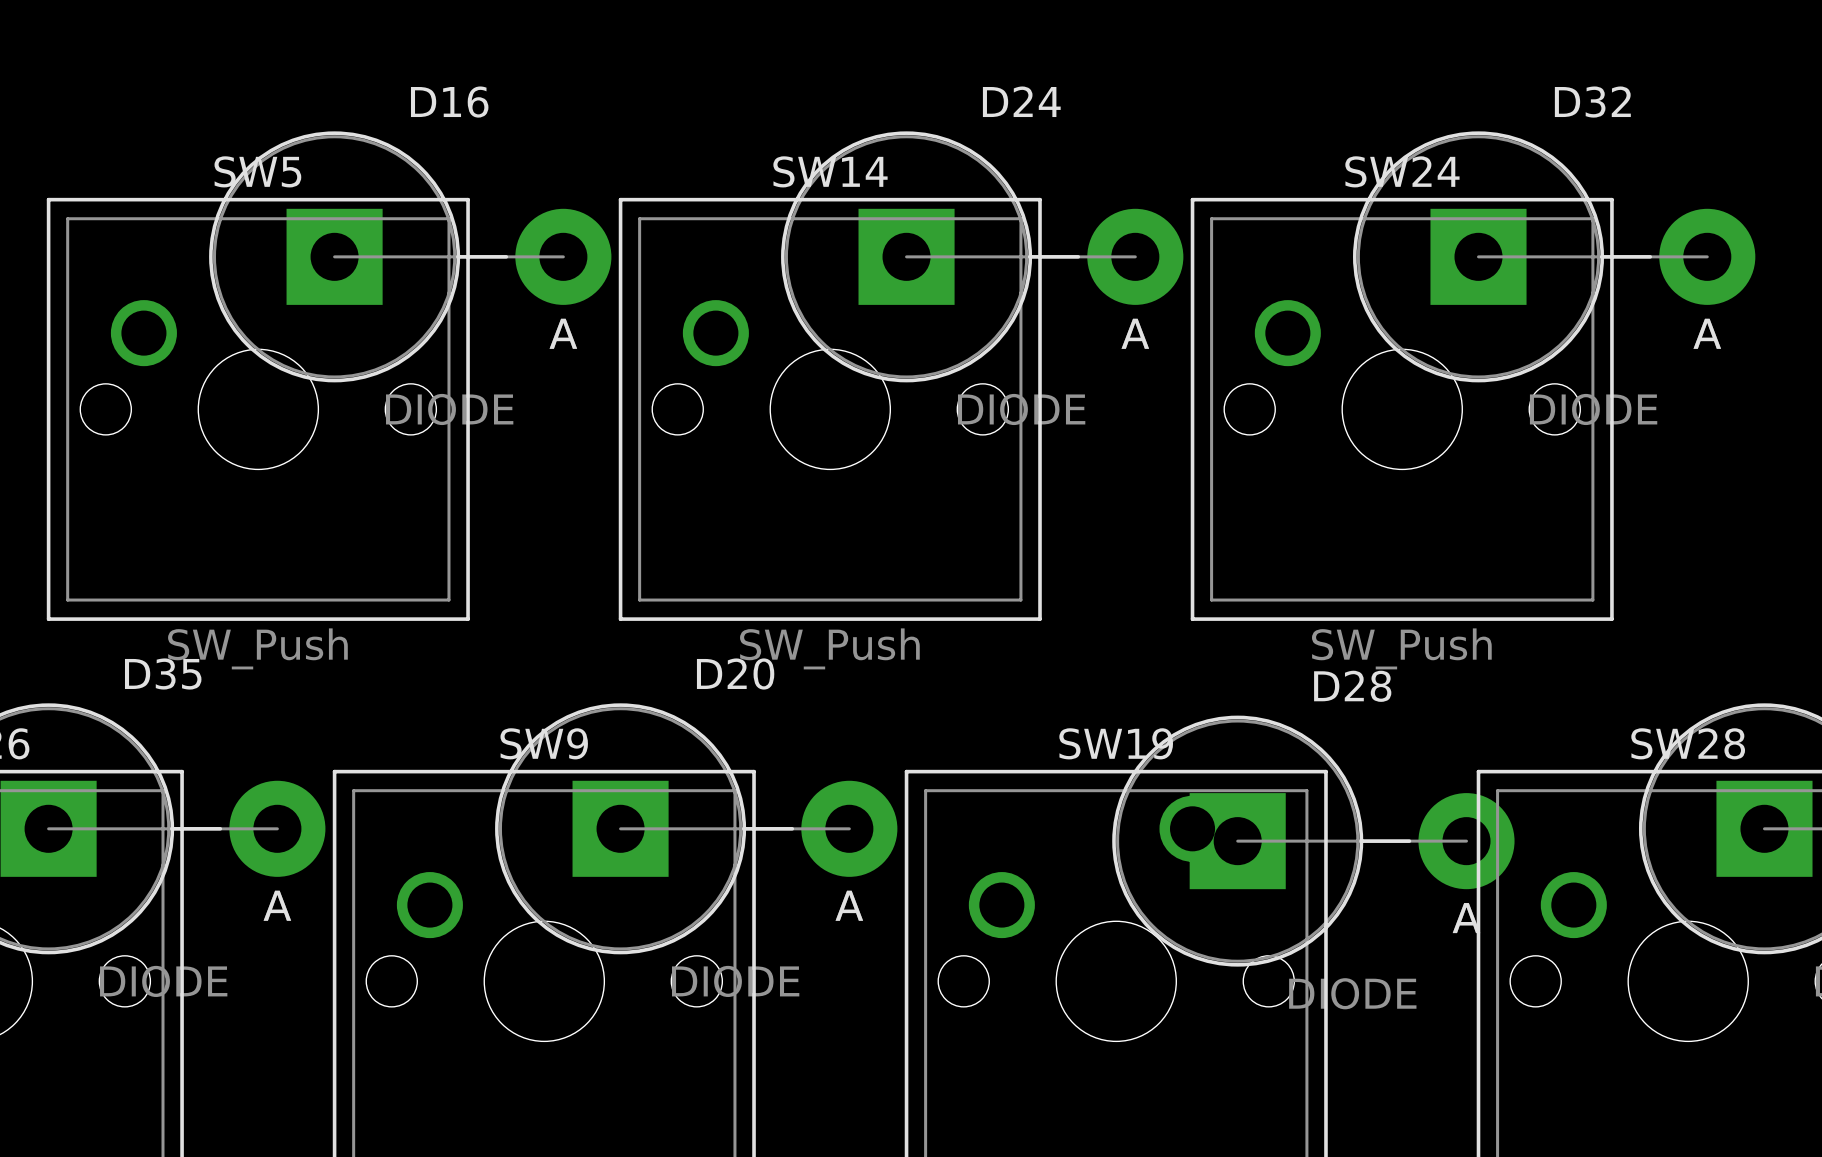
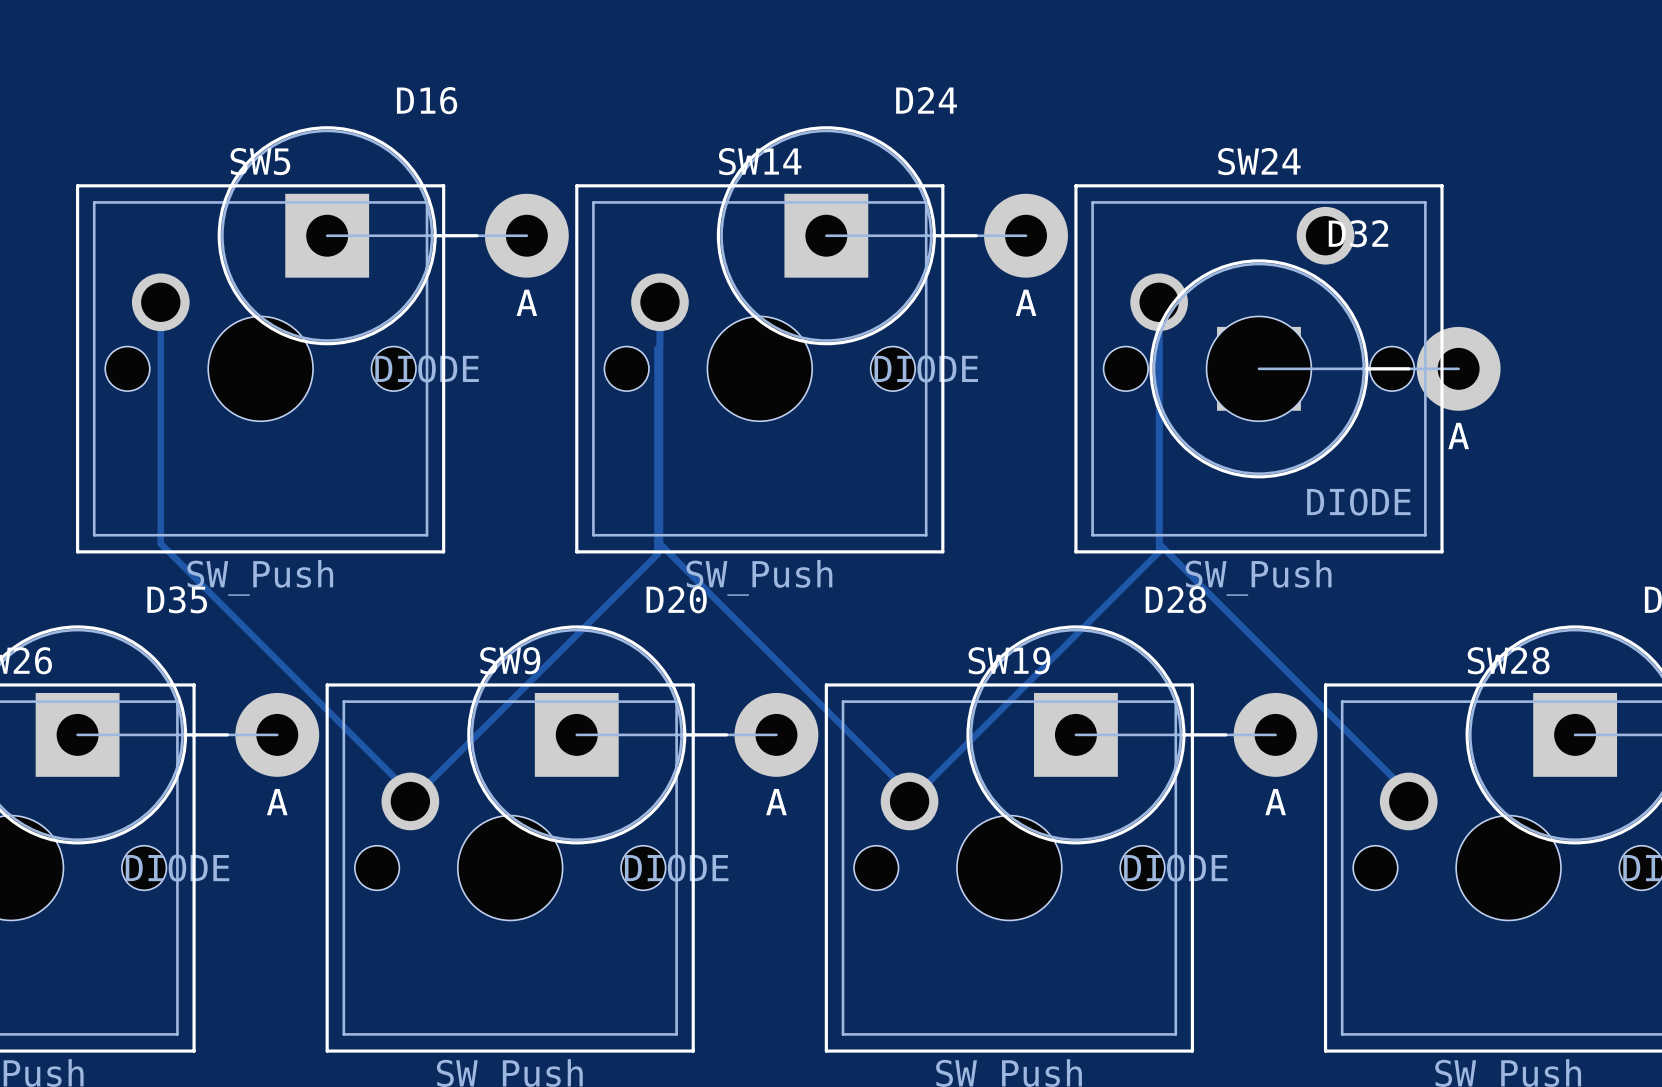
D32 position: (1554, 256) -> (1325, 368)
track: none -> (160, 302) (160, 543) (410, 793) (410, 801) (657, 554) (657, 348) (659, 346)
track: none -> (659, 302) (659, 543) (909, 793) (909, 801) (1159, 551) (1159, 302)
track: none -> (1159, 543) (1408, 793) (1408, 801)
D28 position: (1313, 841) -> (1141, 734)

